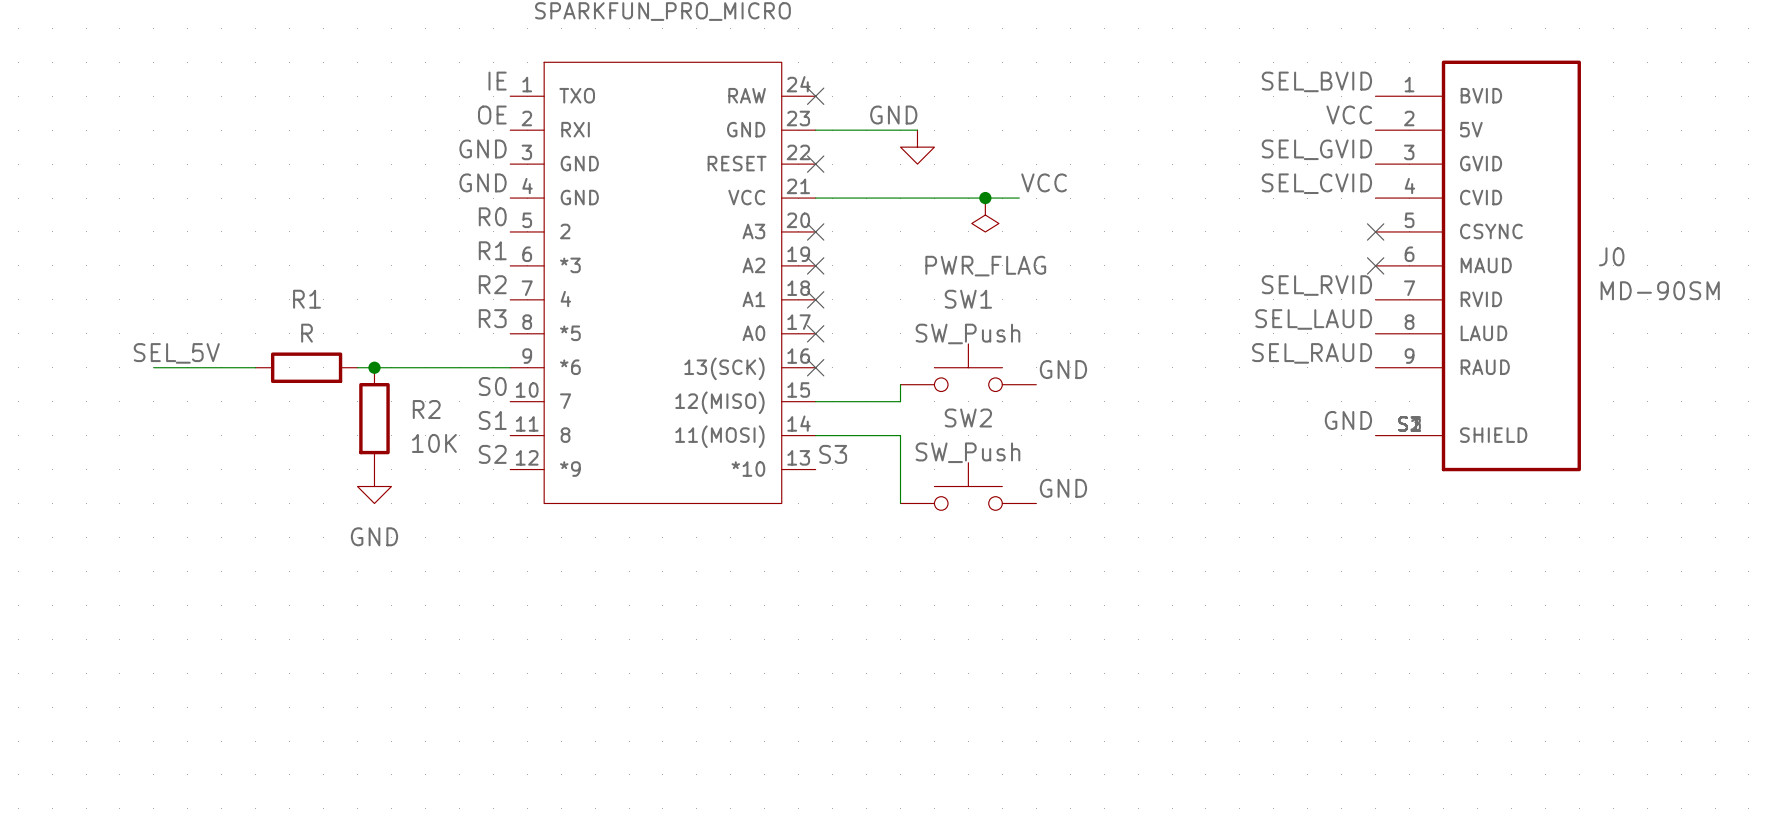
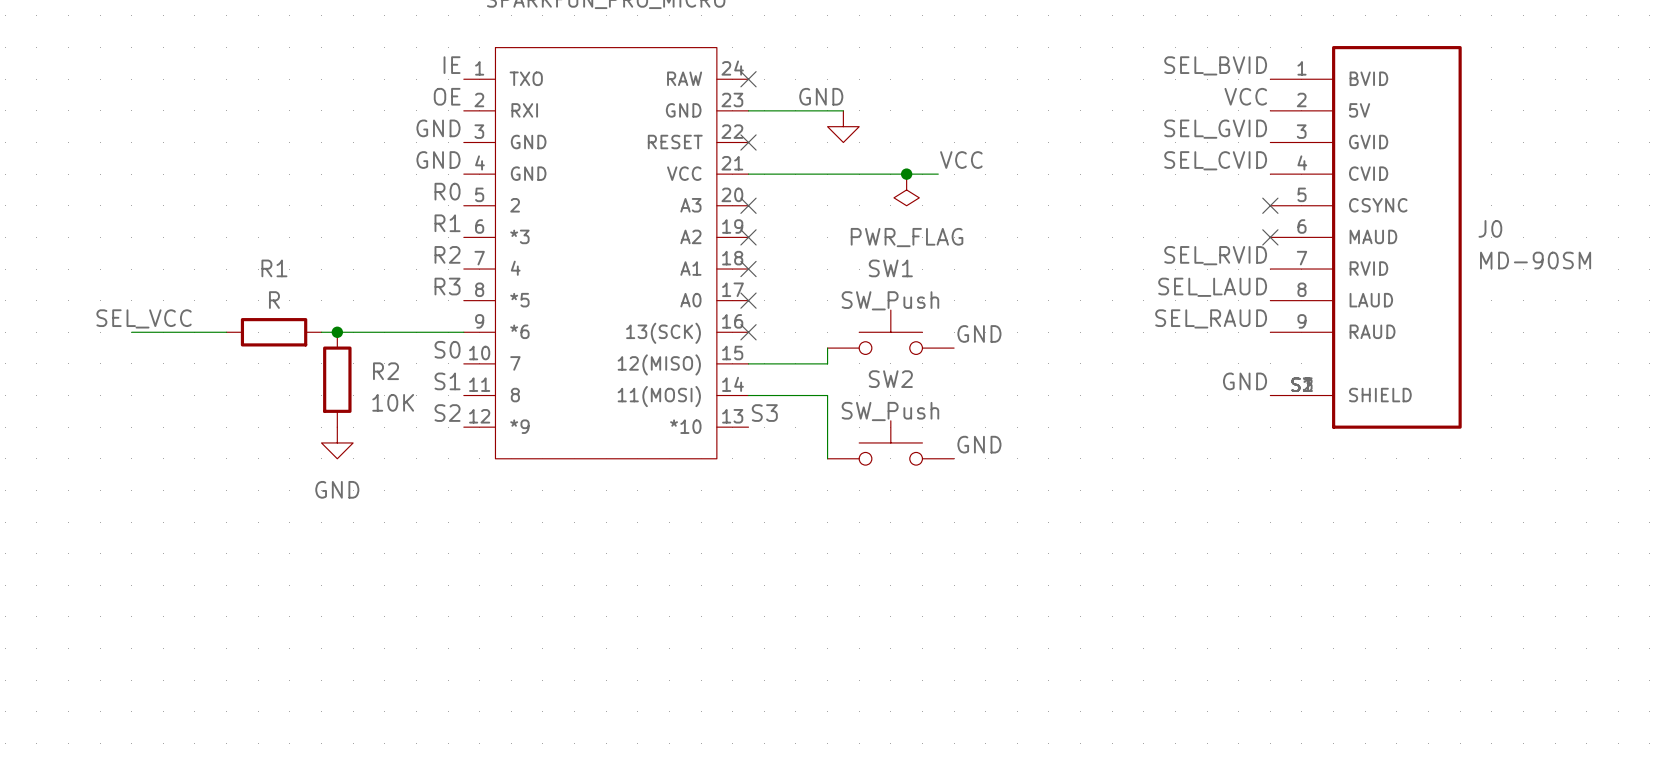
label: SEL_5V (176, 353) -> SEL_VCC (144, 318)

